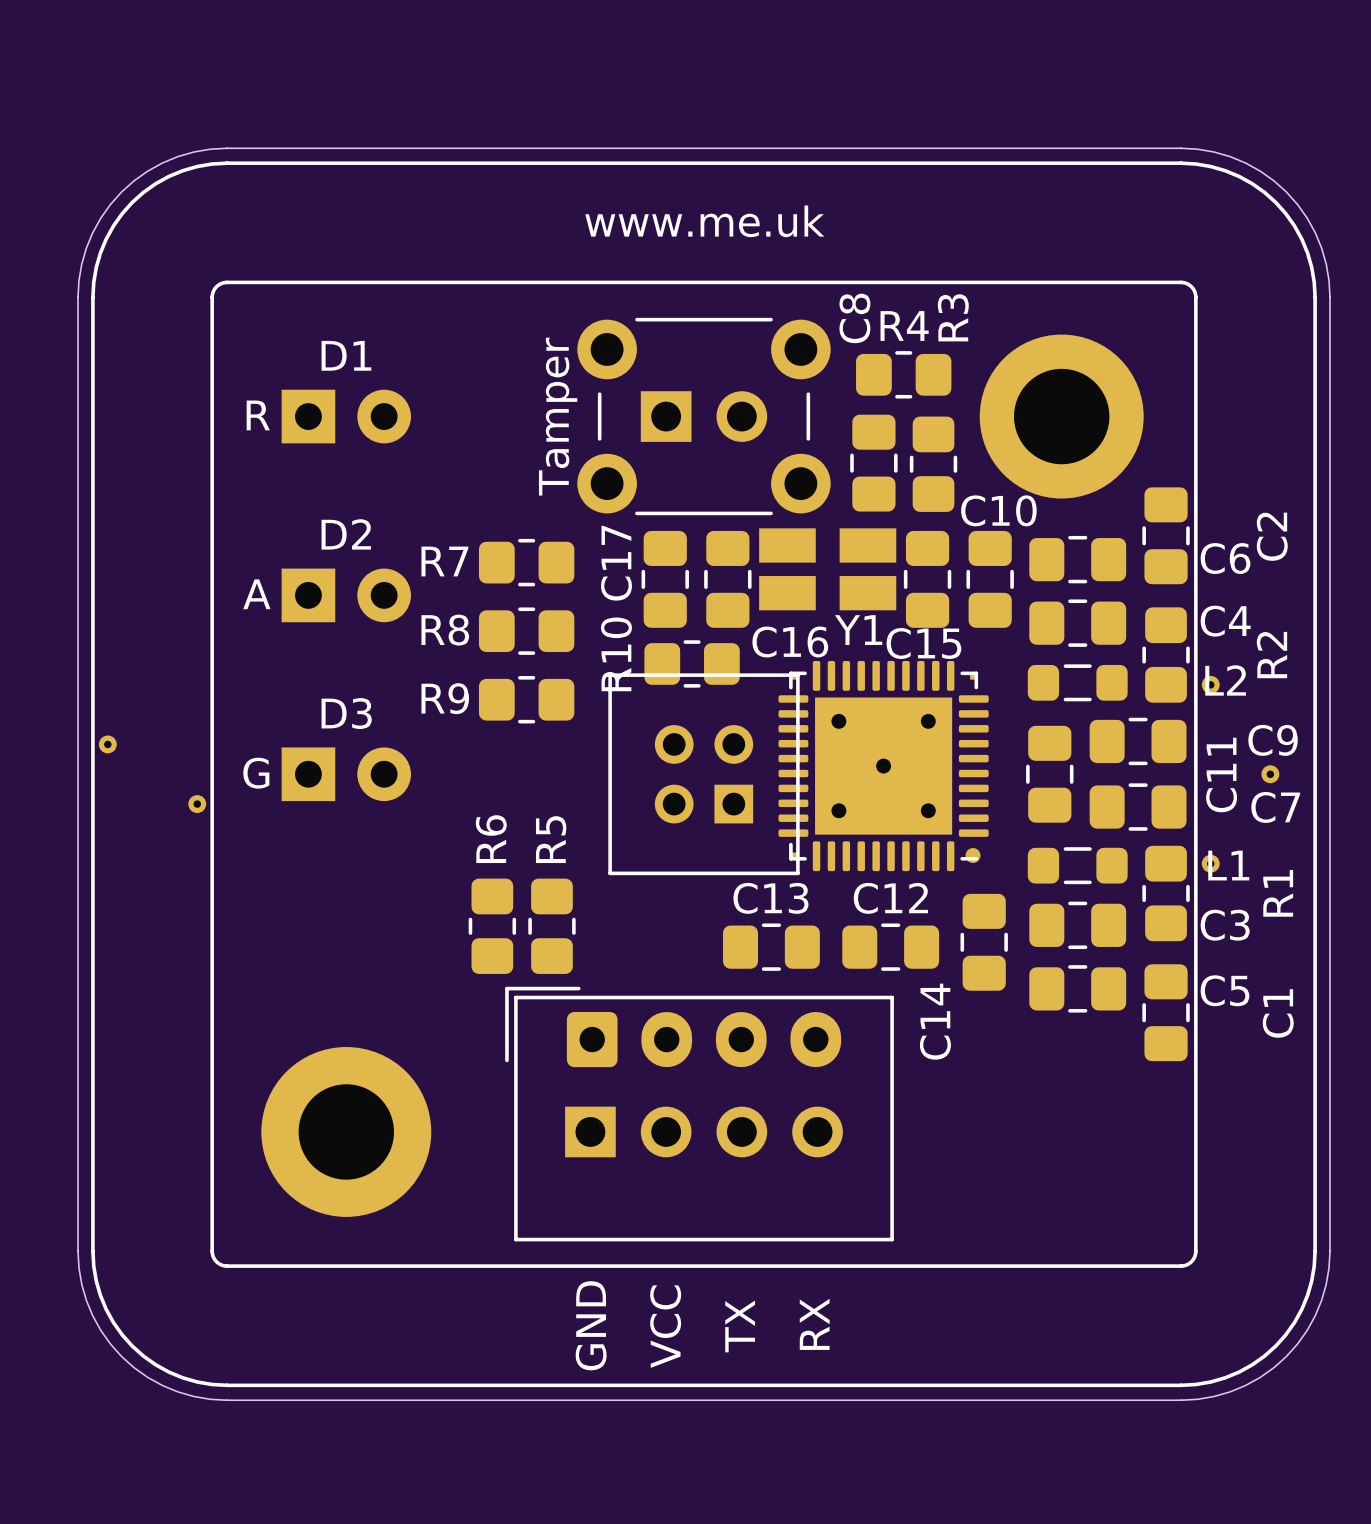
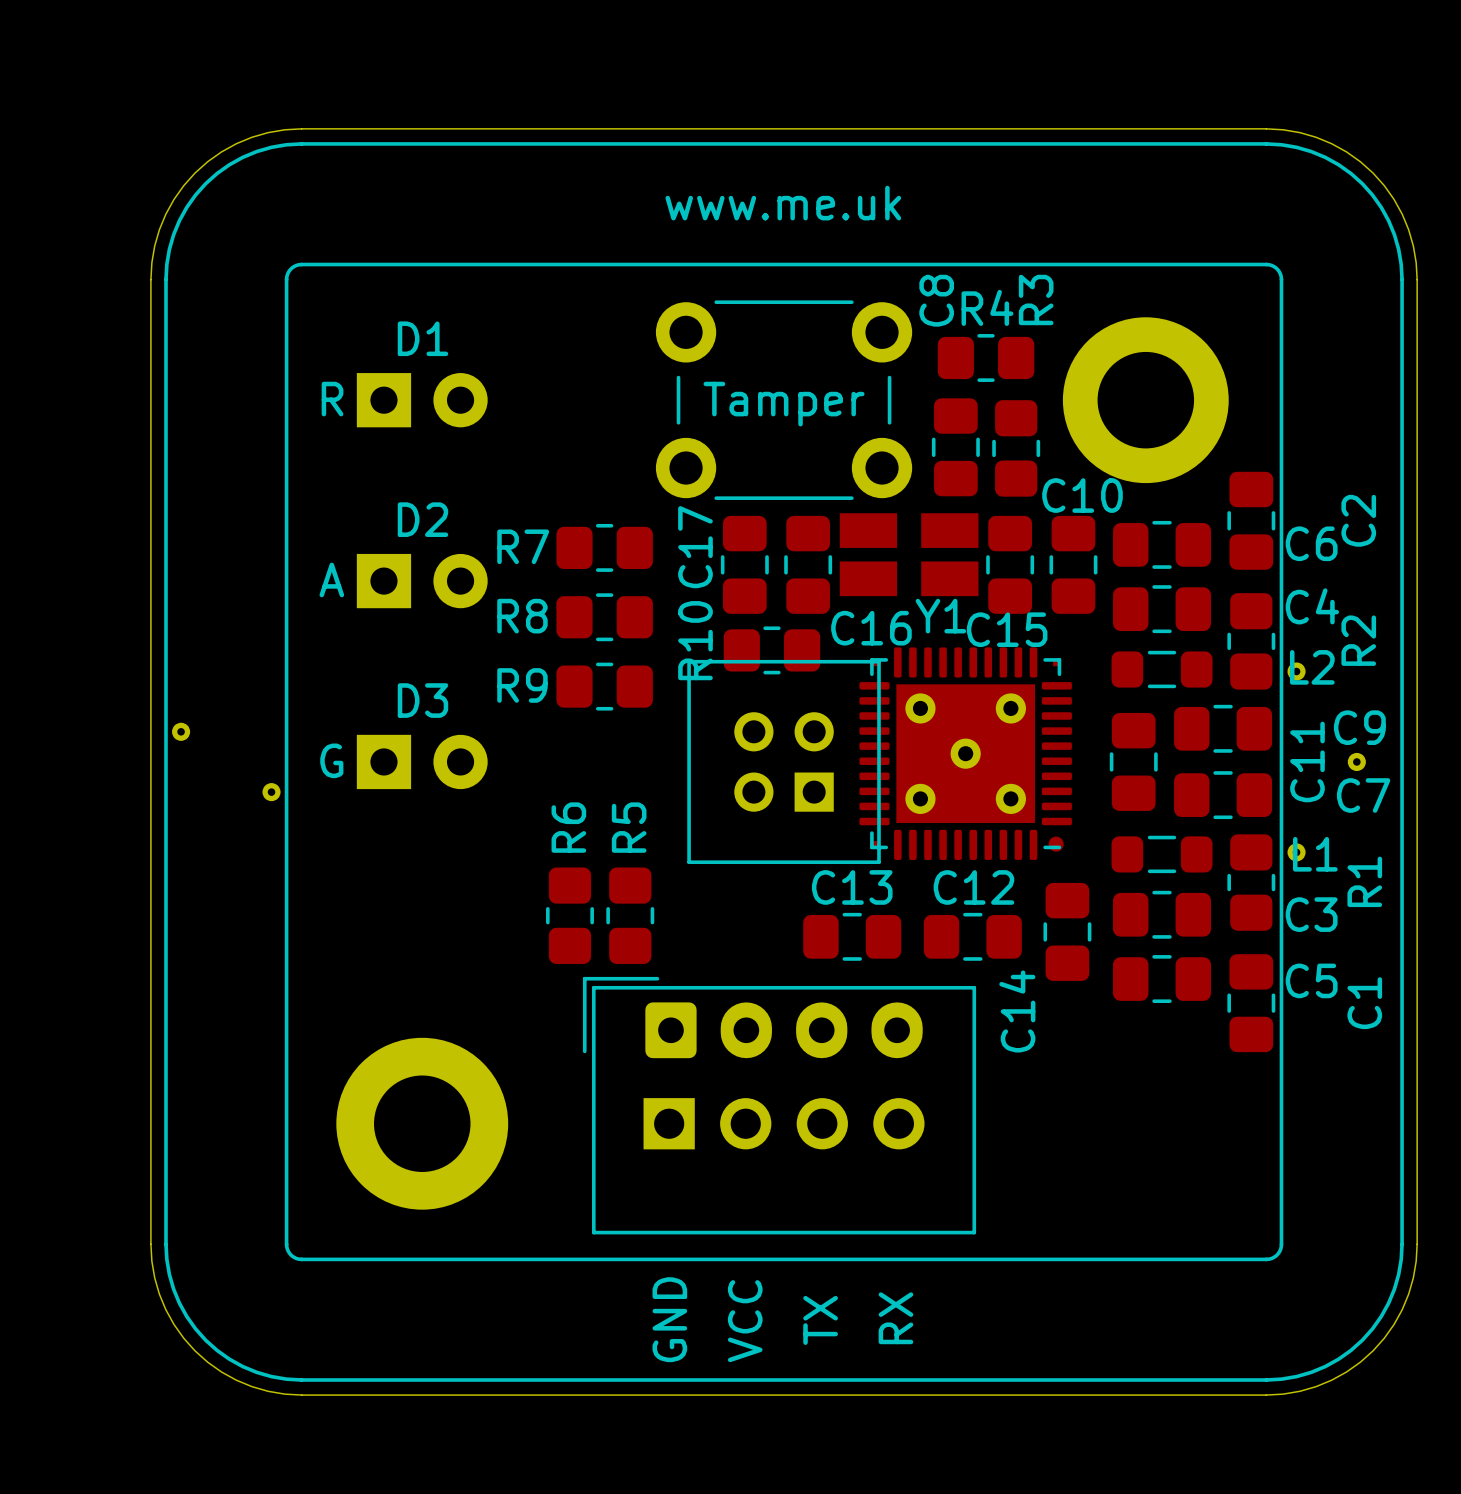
text rotation: 0° (558, 416) -> 90° clockwise (784, 404)
part: (704, 416) -> none

